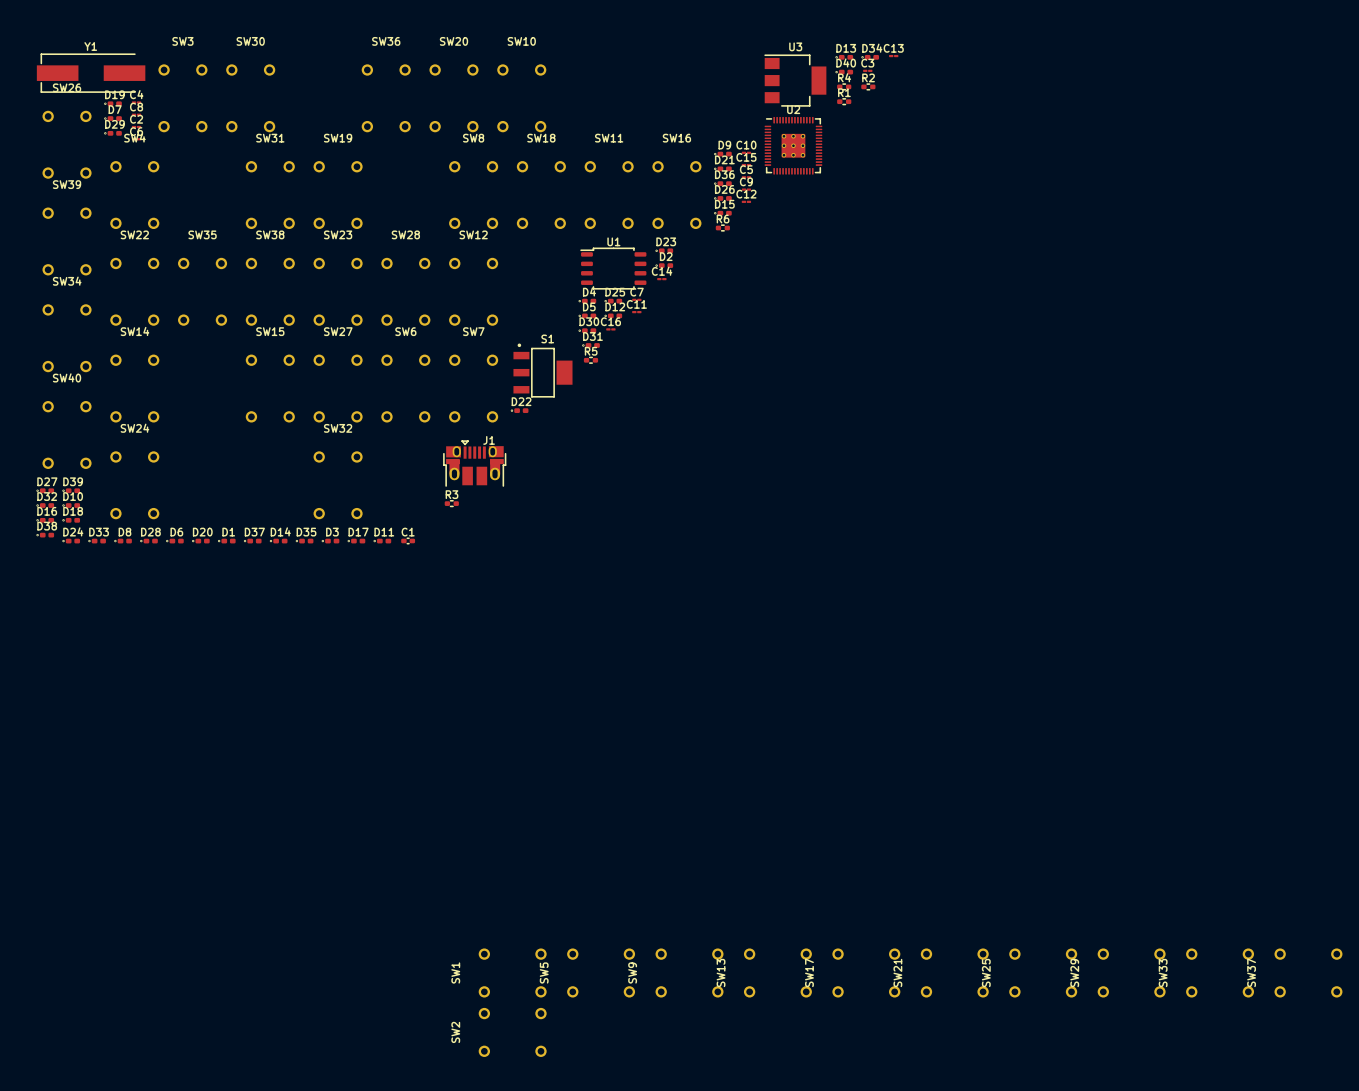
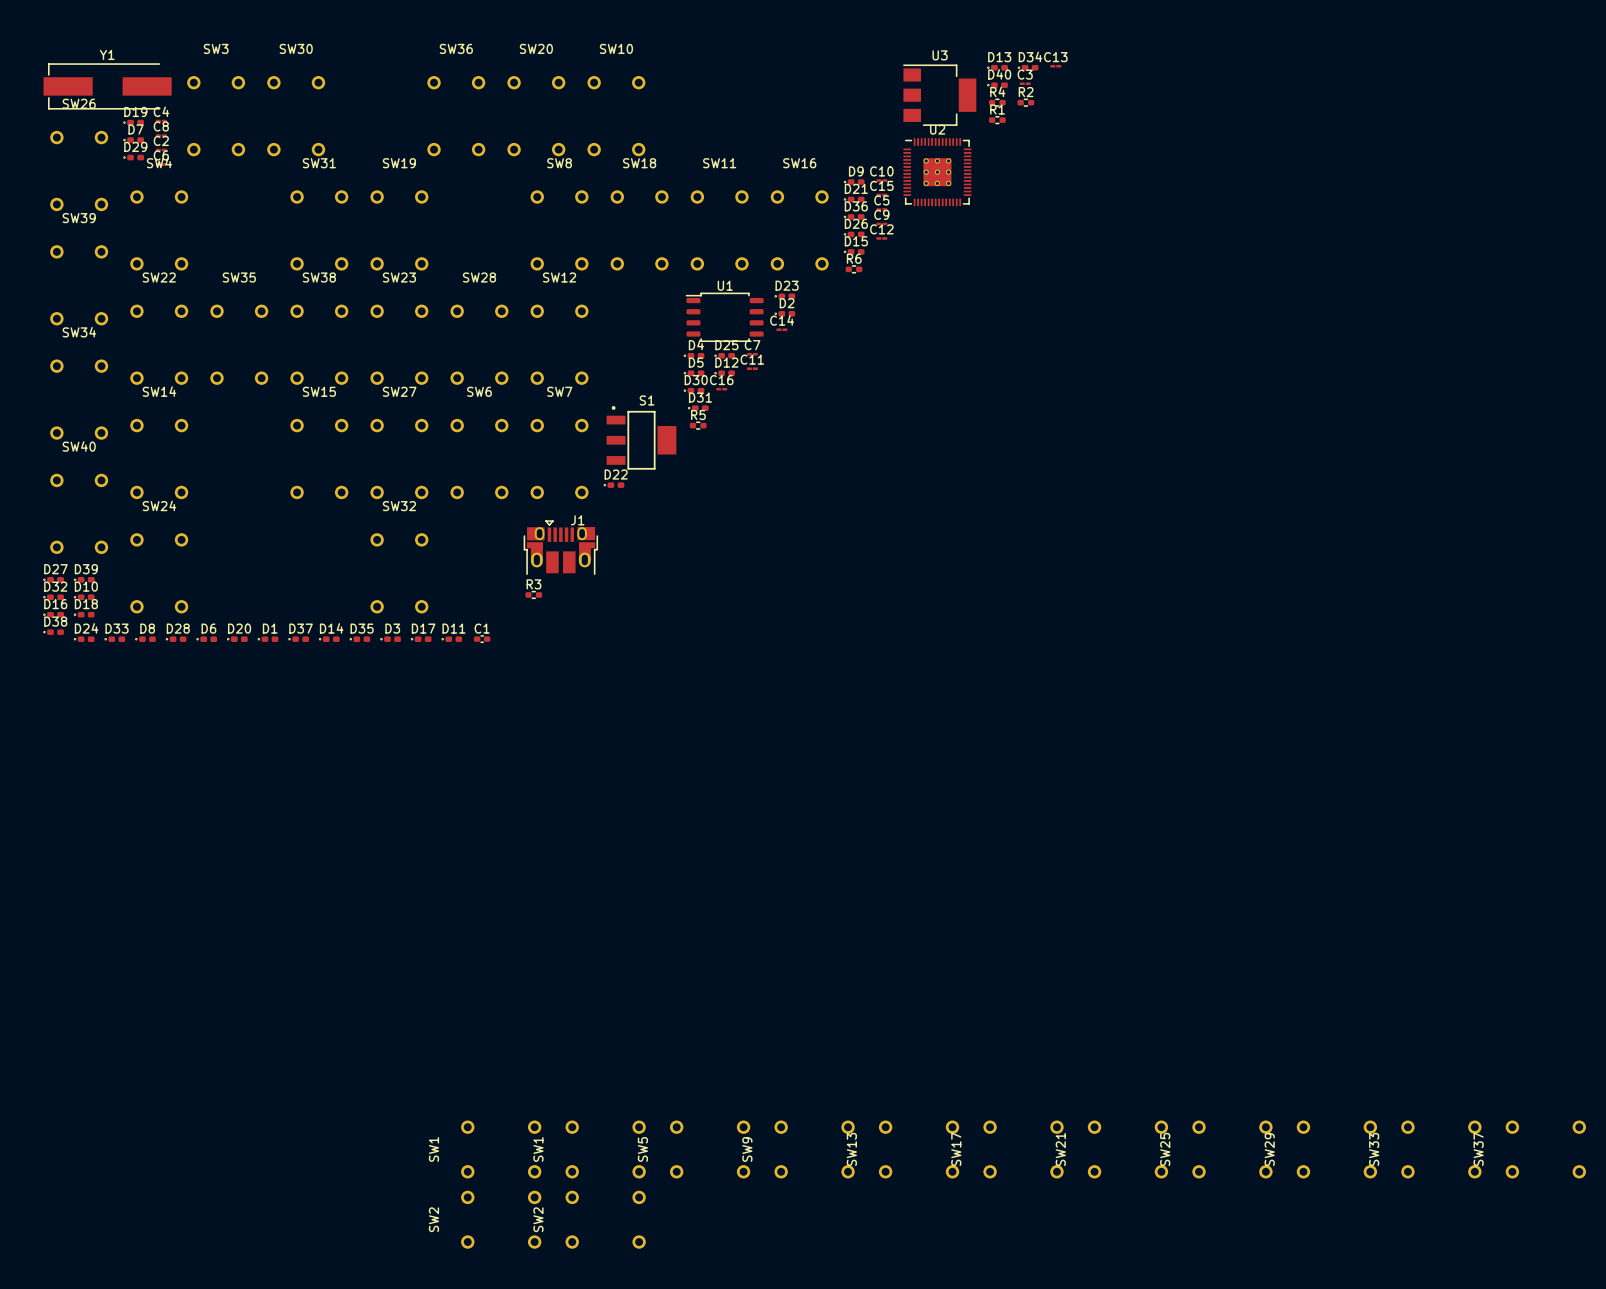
SW1: none -> (501, 1149)
SW2: none -> (501, 1219)

